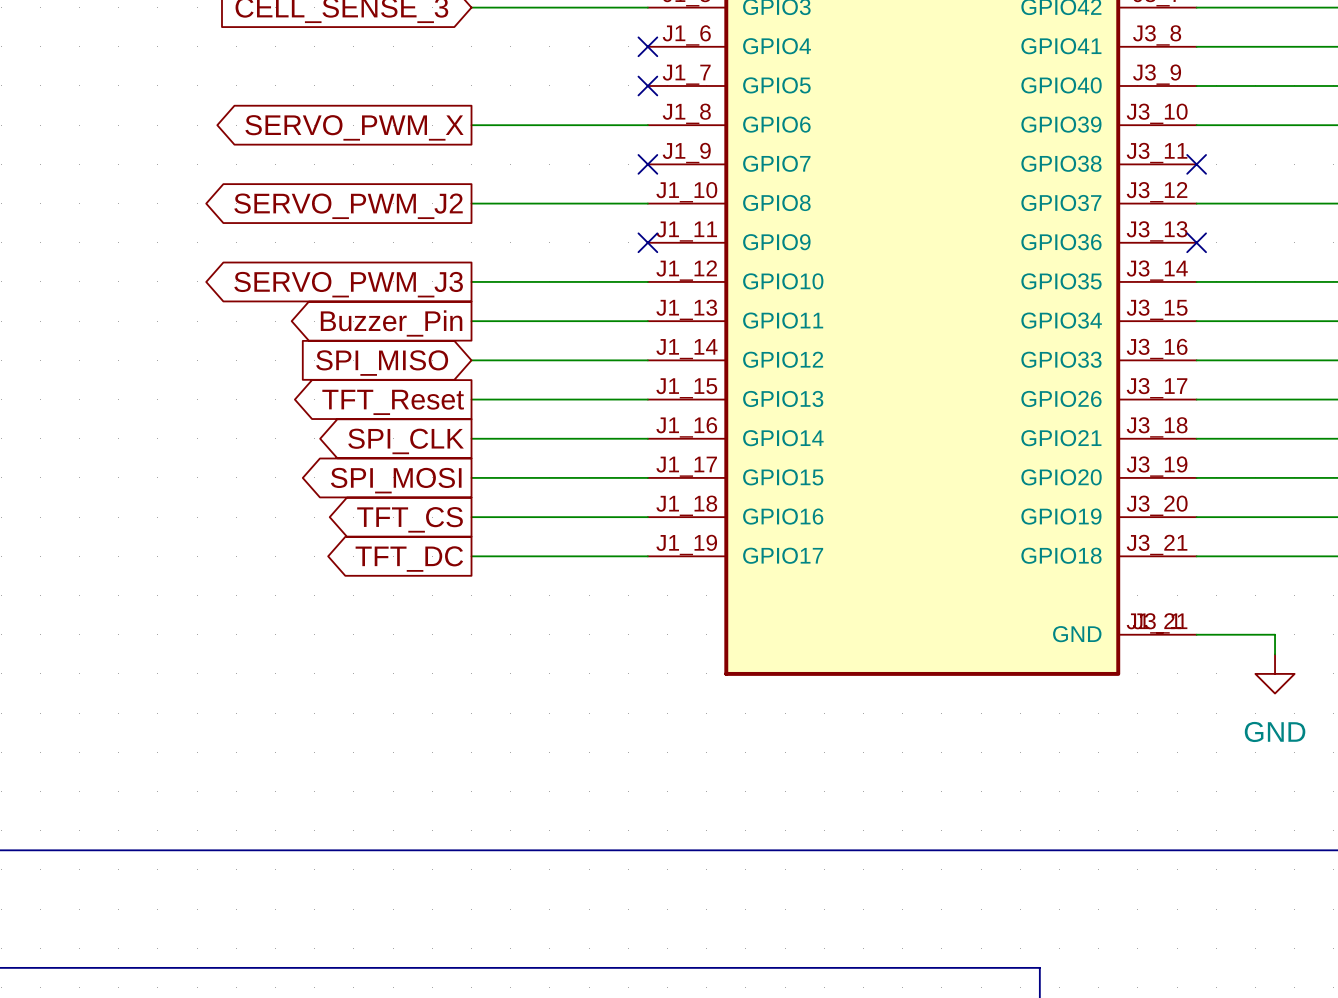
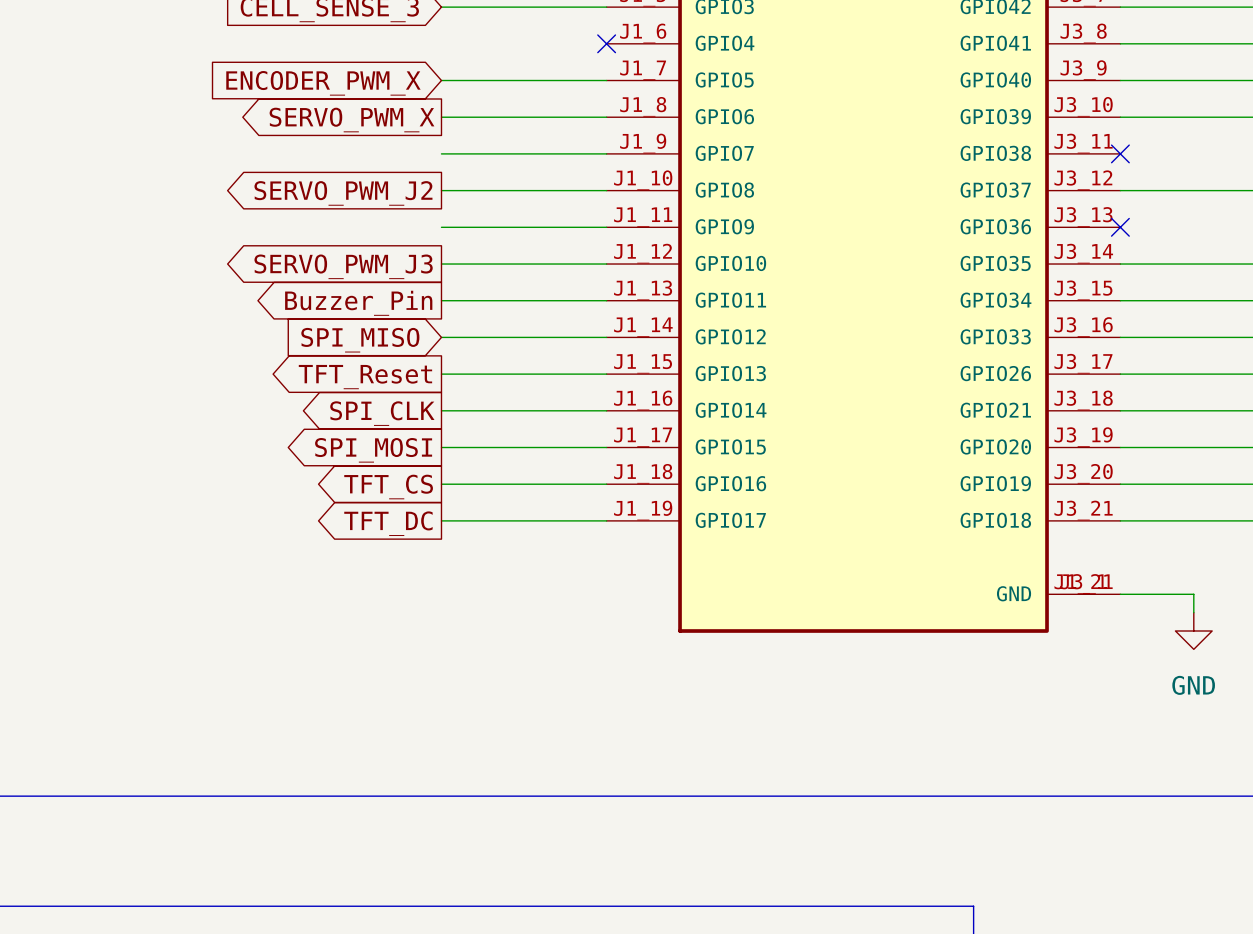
wire: none -> (441, 80) (606, 80)
no-connect mark: (647, 85) -> none
global label: none -> ENCODER_PWM_X (323, 83)
wire: none -> (441, 153) (606, 153)
no-connect mark: (647, 164) -> none
wire: none -> (441, 227) (606, 227)
no-connect mark: (647, 242) -> none

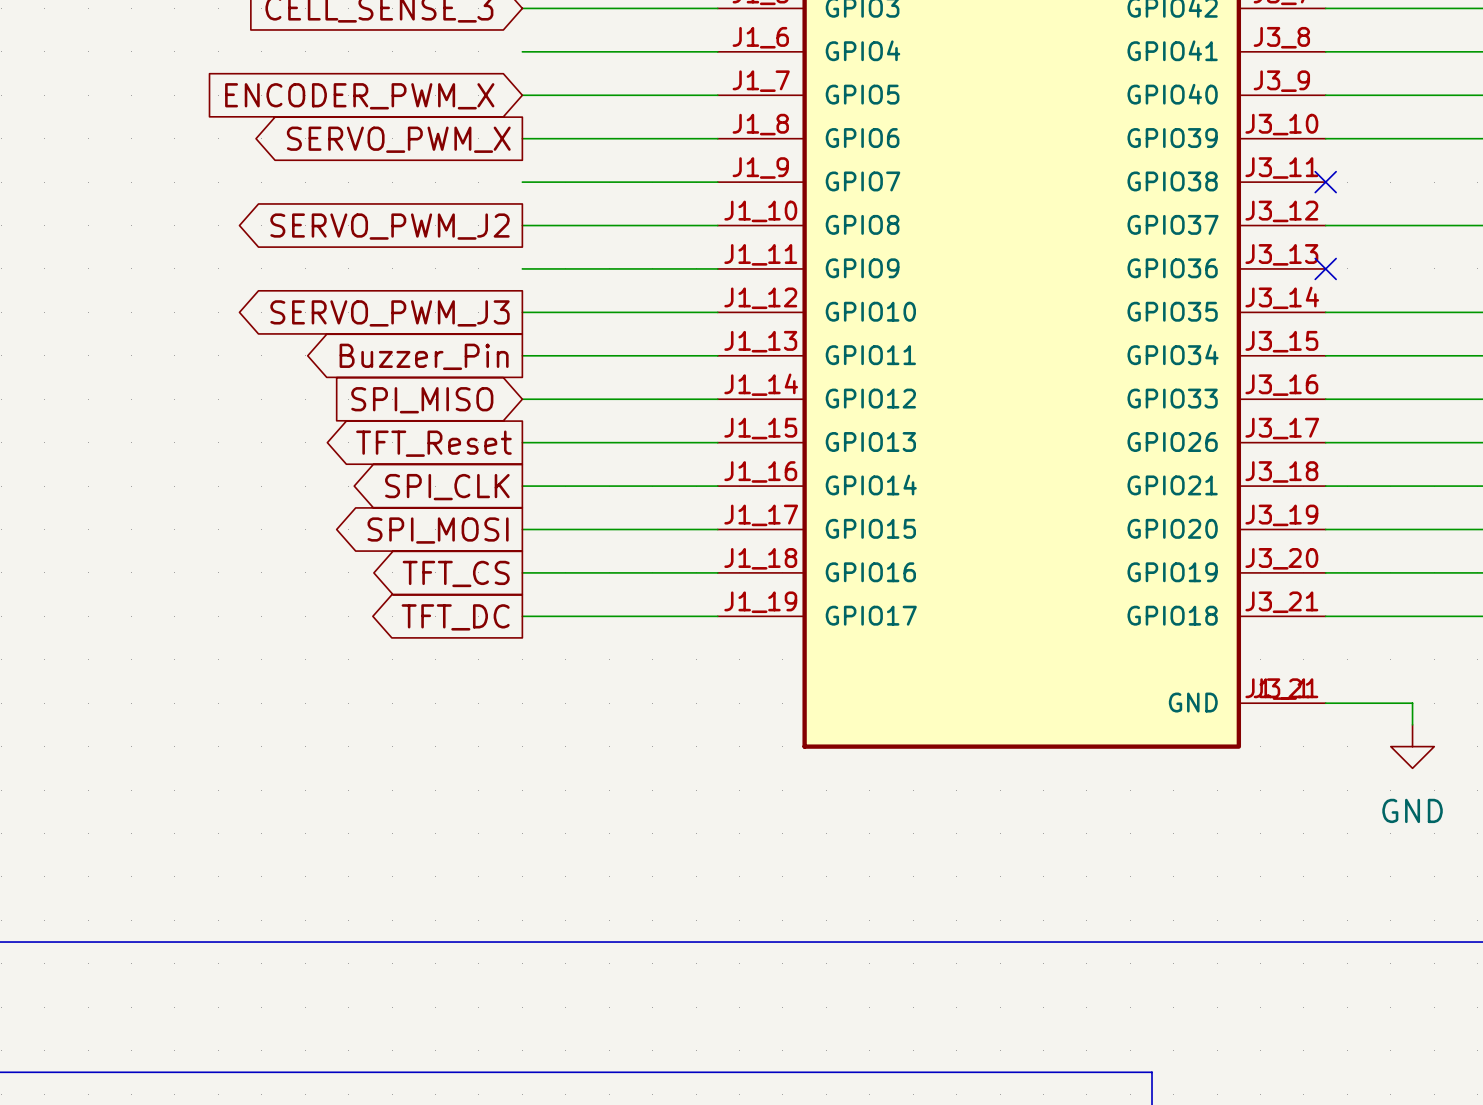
wire: none -> (522, 51) (717, 51)
no-connect mark: (606, 43) -> none

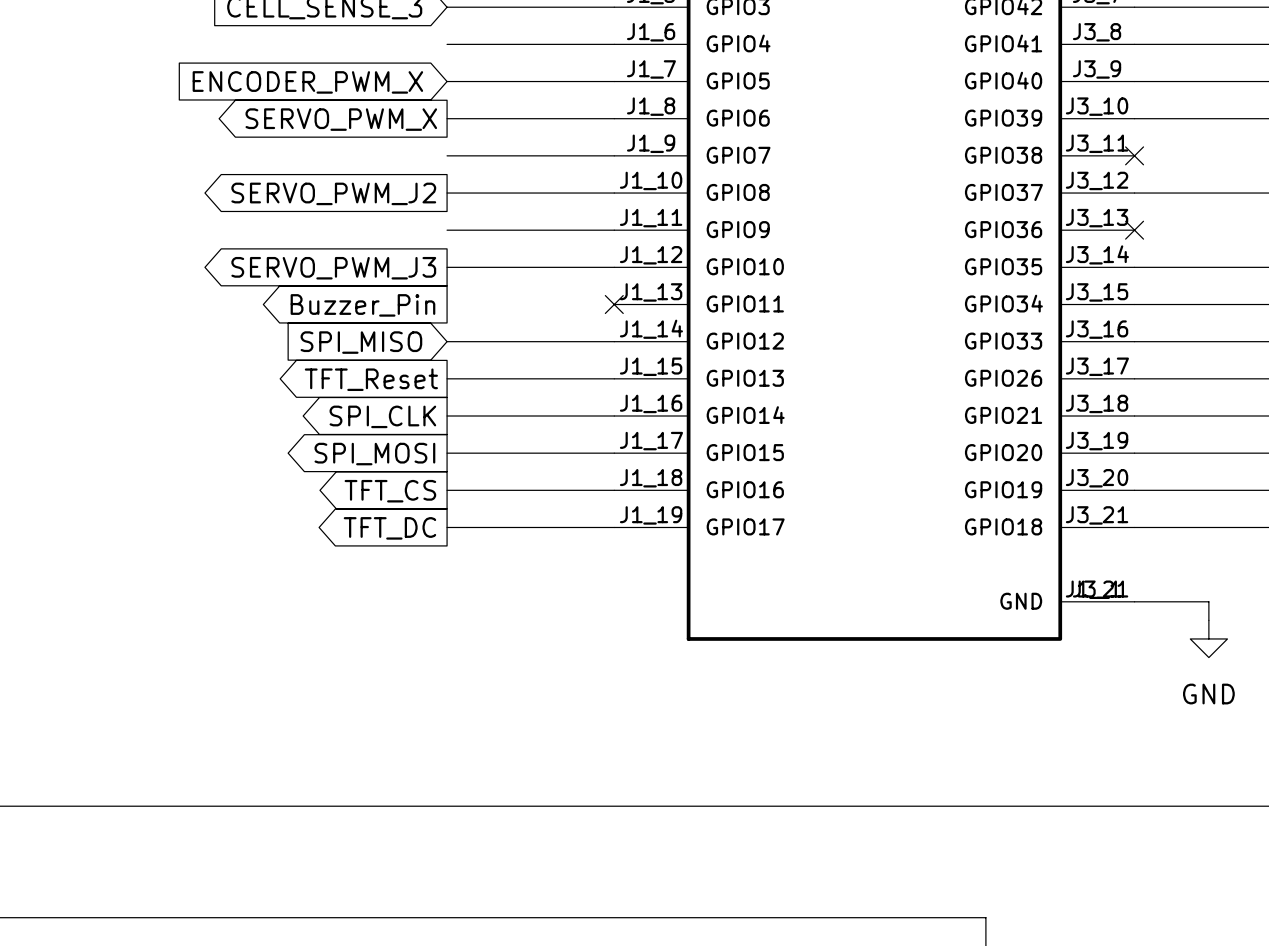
wire: (522, 355) (717, 355) -> none
no-connect mark: none -> (614, 304)

